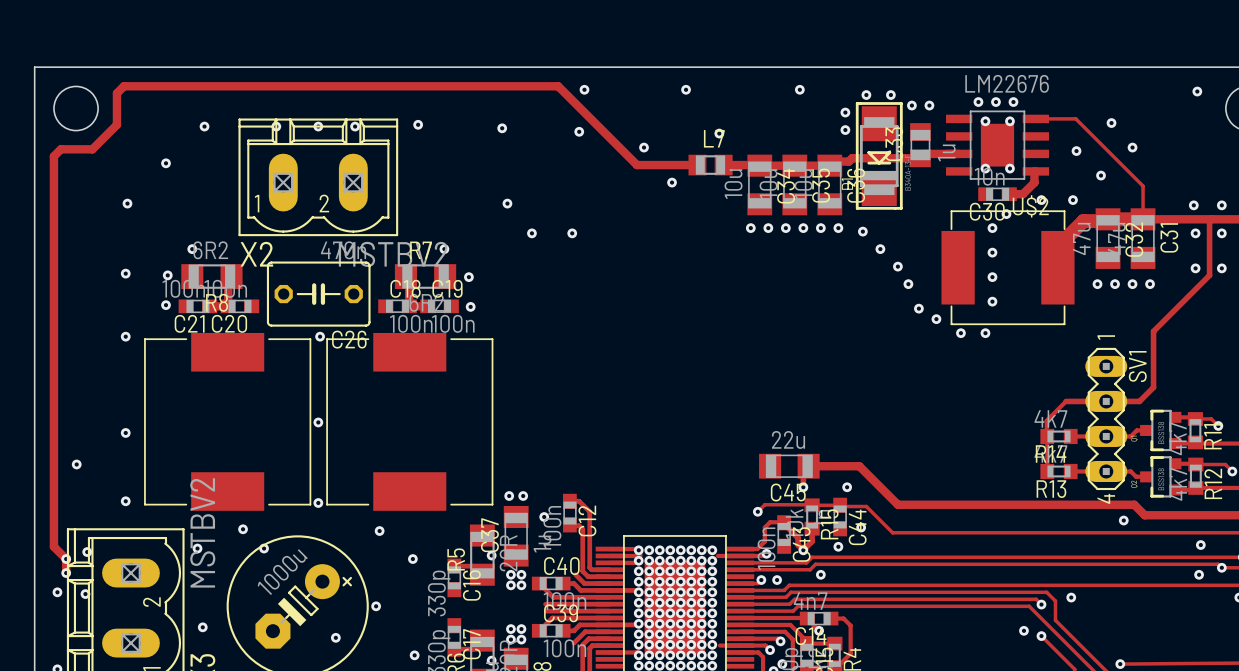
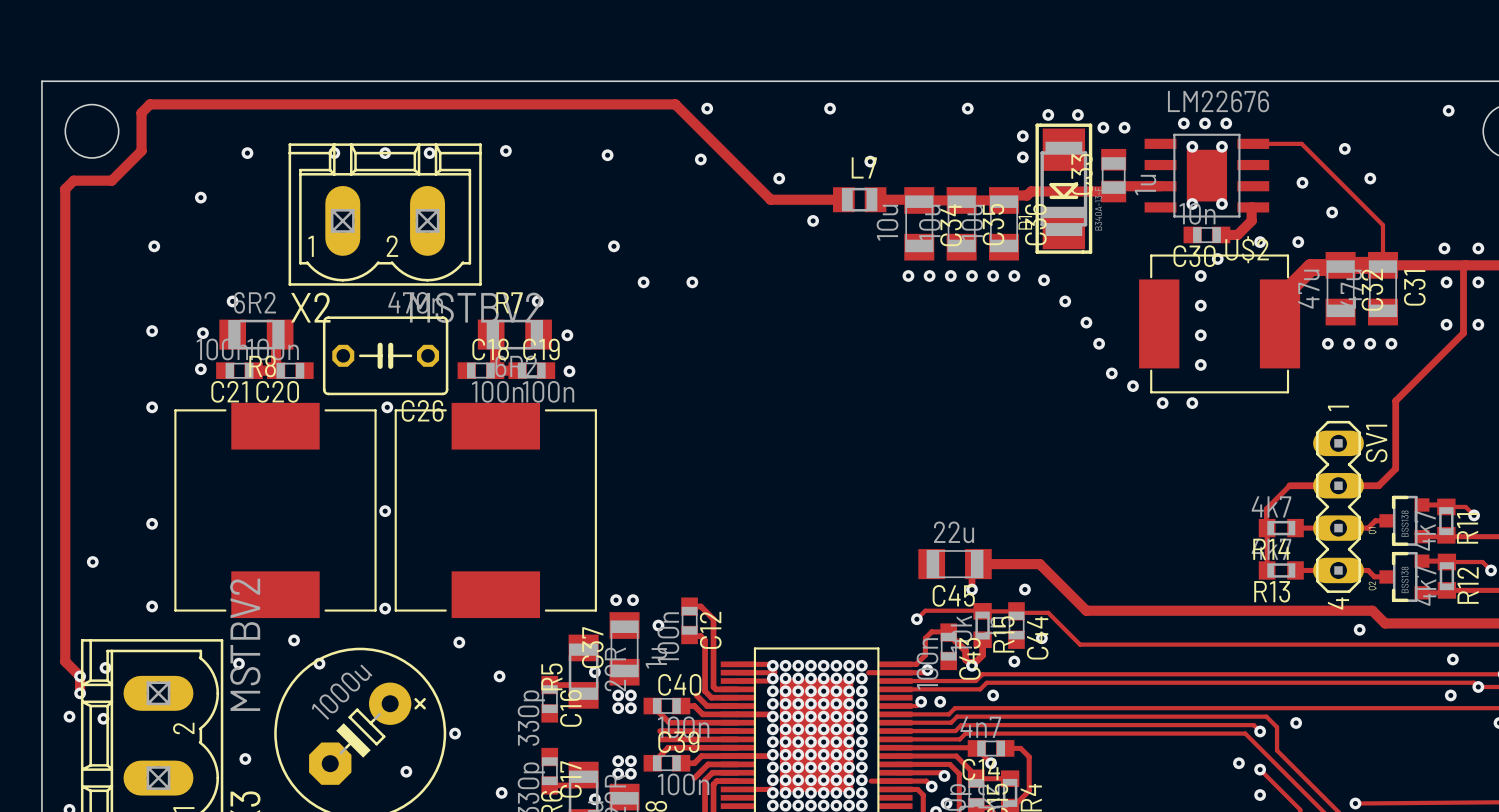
via: none -> (1260, 795)

